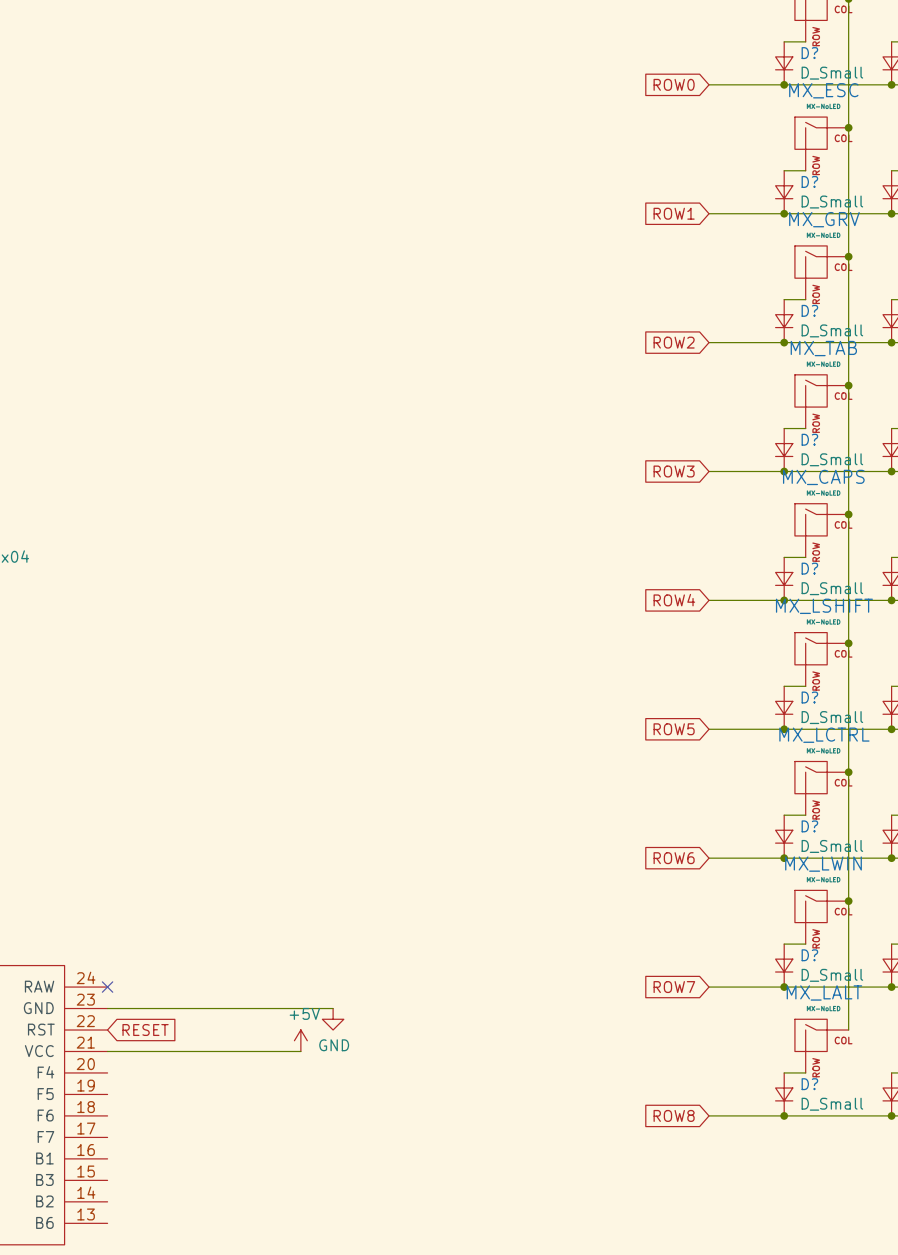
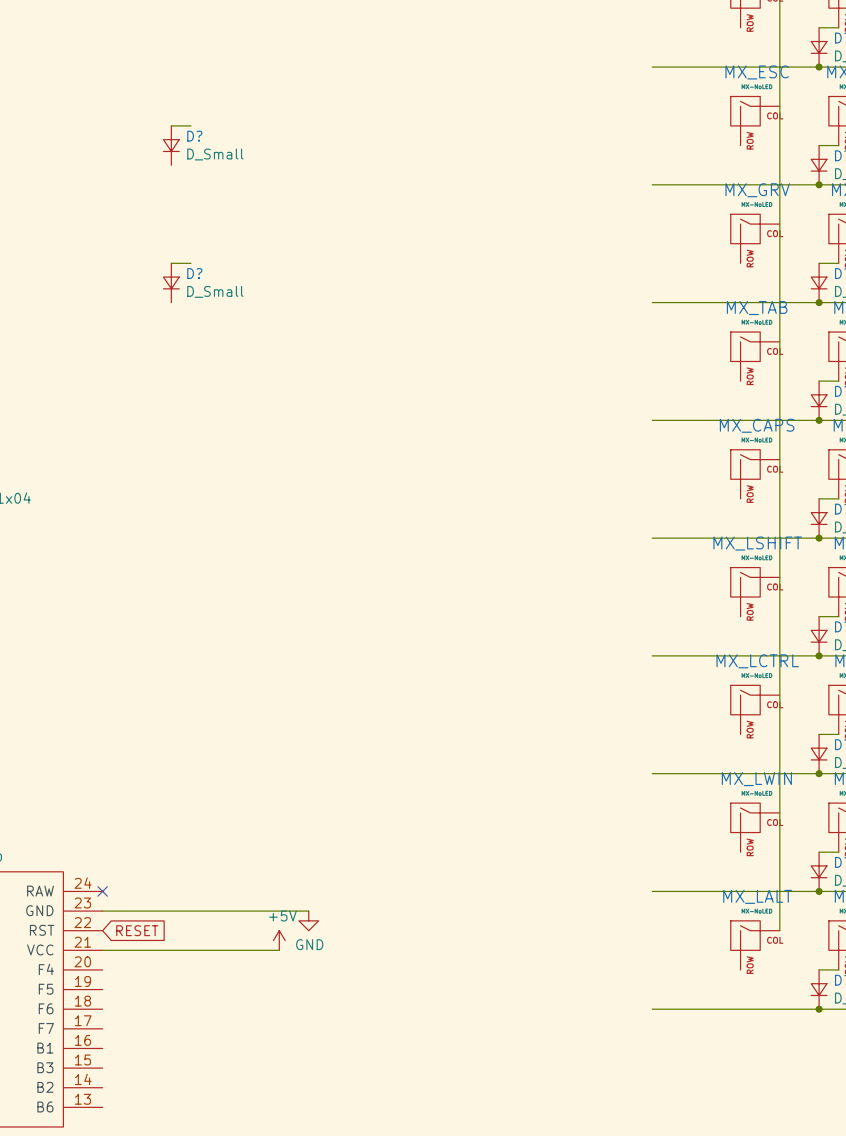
wire: (784, 41) (805, 41) -> none
D?: D_Small (784, 63) -> none
global label: ROW0 (674, 84) -> none
junction: (784, 84) -> none
junction: (848, 127) -> none
wire: none -> (171, 125) (190, 125)
D?: none -> D_Small (171, 145)
wire: (784, 170) (805, 170) -> none
D?: D_Small (784, 192) -> none
global label: ROW1 (674, 213) -> none
junction: (784, 213) -> none
junction: (848, 256) -> none
wire: none -> (171, 263) (190, 263)
wire: (784, 299) (805, 299) -> none
D?: none -> D_Small (171, 282)
D?: D_Small (784, 321) -> none
global label: ROW2 (674, 342) -> none
junction: (784, 342) -> none
junction: (848, 385) -> none
wire: (784, 428) (805, 428) -> none
D?: D_Small (784, 450) -> none
global label: ROW3 (674, 471) -> none
junction: (784, 471) -> none
junction: (848, 514) -> none
wire: (784, 557) (805, 557) -> none
D?: D_Small (784, 578) -> none
global label: ROW4 (674, 600) -> none
junction: (784, 600) -> none
junction: (848, 643) -> none
wire: (784, 686) (805, 686) -> none
D?: D_Small (784, 707) -> none
global label: ROW5 (674, 729) -> none
junction: (784, 729) -> none
junction: (848, 772) -> none
wire: (784, 815) (805, 815) -> none
D?: D_Small (784, 836) -> none
global label: ROW6 (674, 858) -> none
junction: (784, 858) -> none
junction: (848, 901) -> none
wire: (784, 944) (805, 944) -> none
D?: D_Small (784, 965) -> none
global label: ROW7 (674, 987) -> none
junction: (784, 987) -> none
wire: (784, 1072) (805, 1072) -> none
D?: D_Small (784, 1094) -> none
global label: ROW8 (674, 1115) -> none
junction: (784, 1115) -> none

